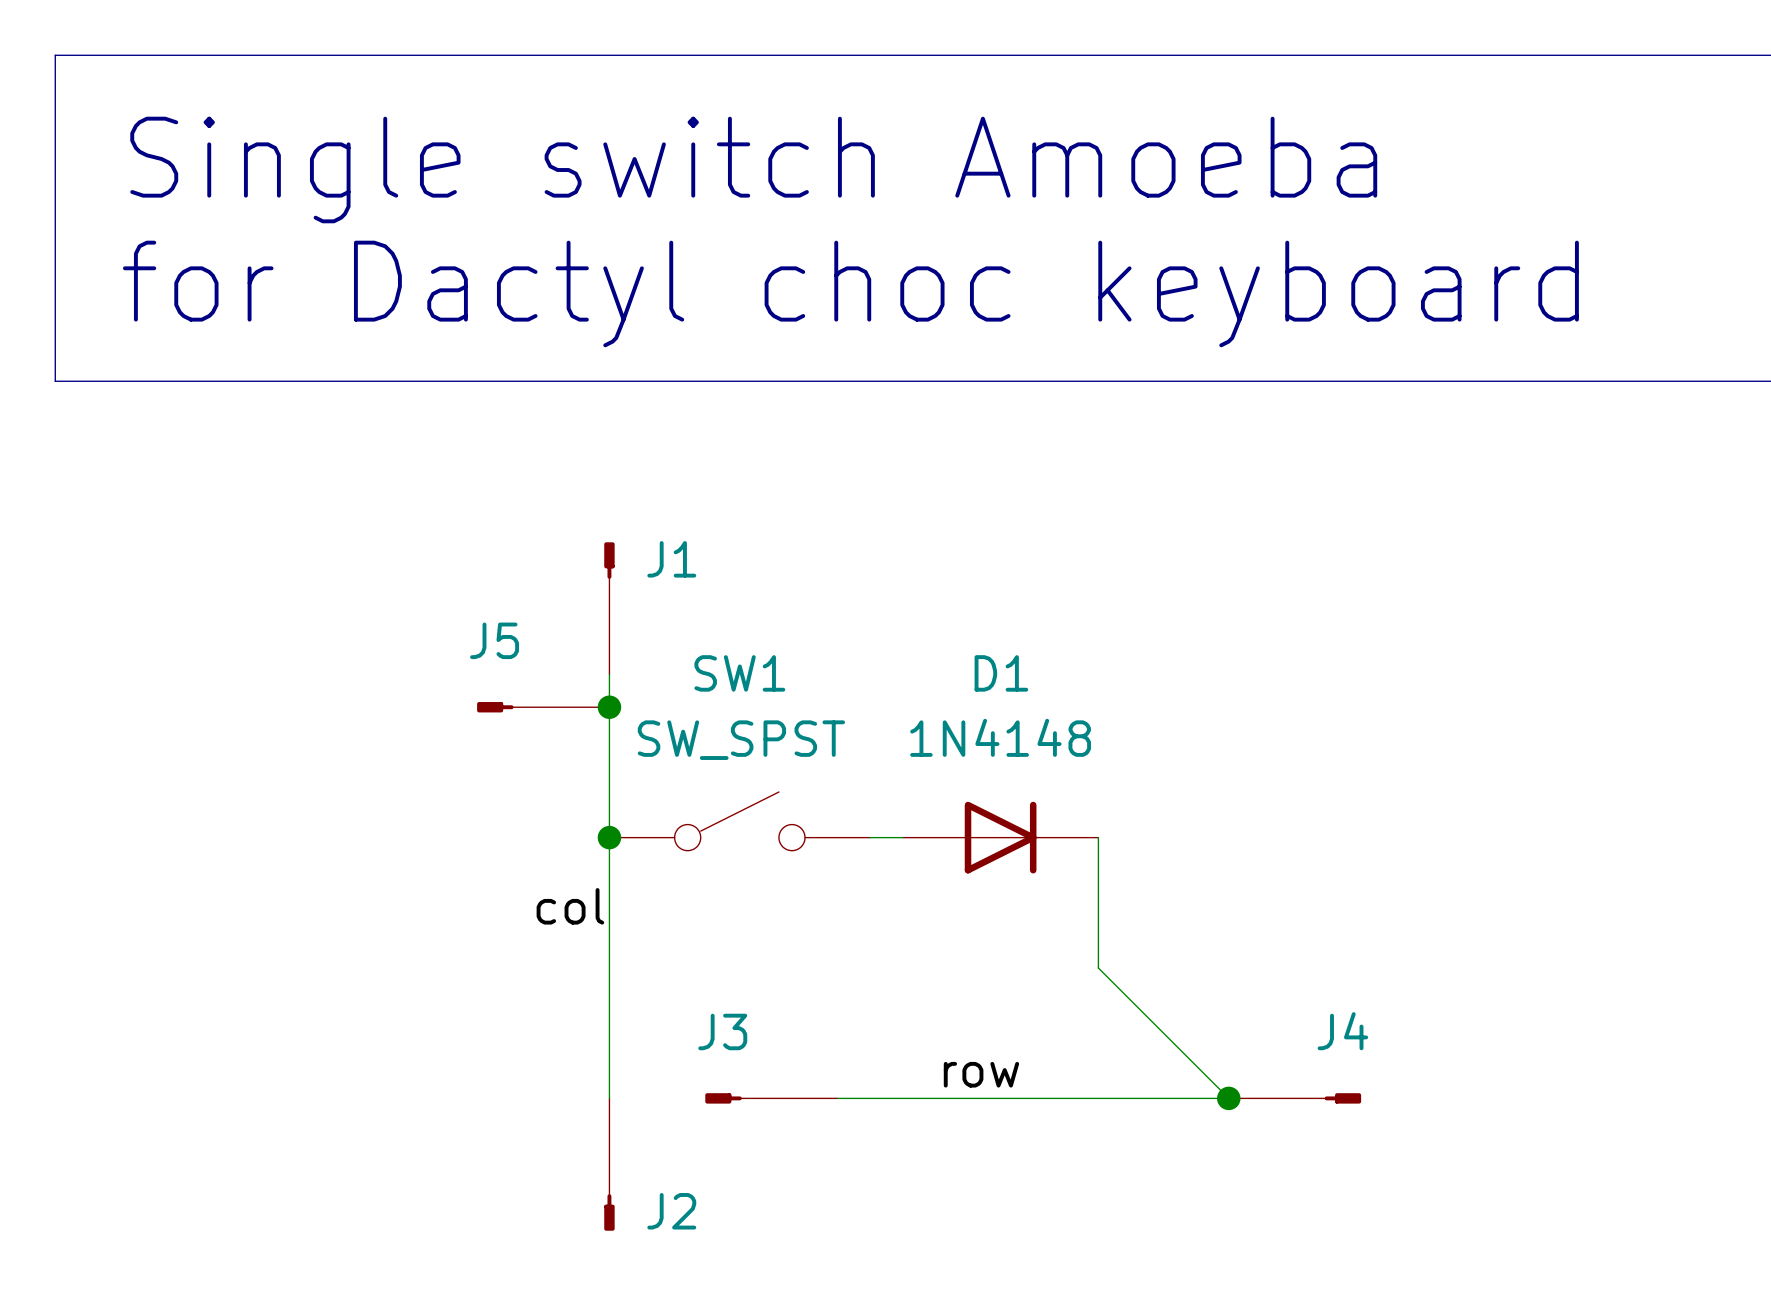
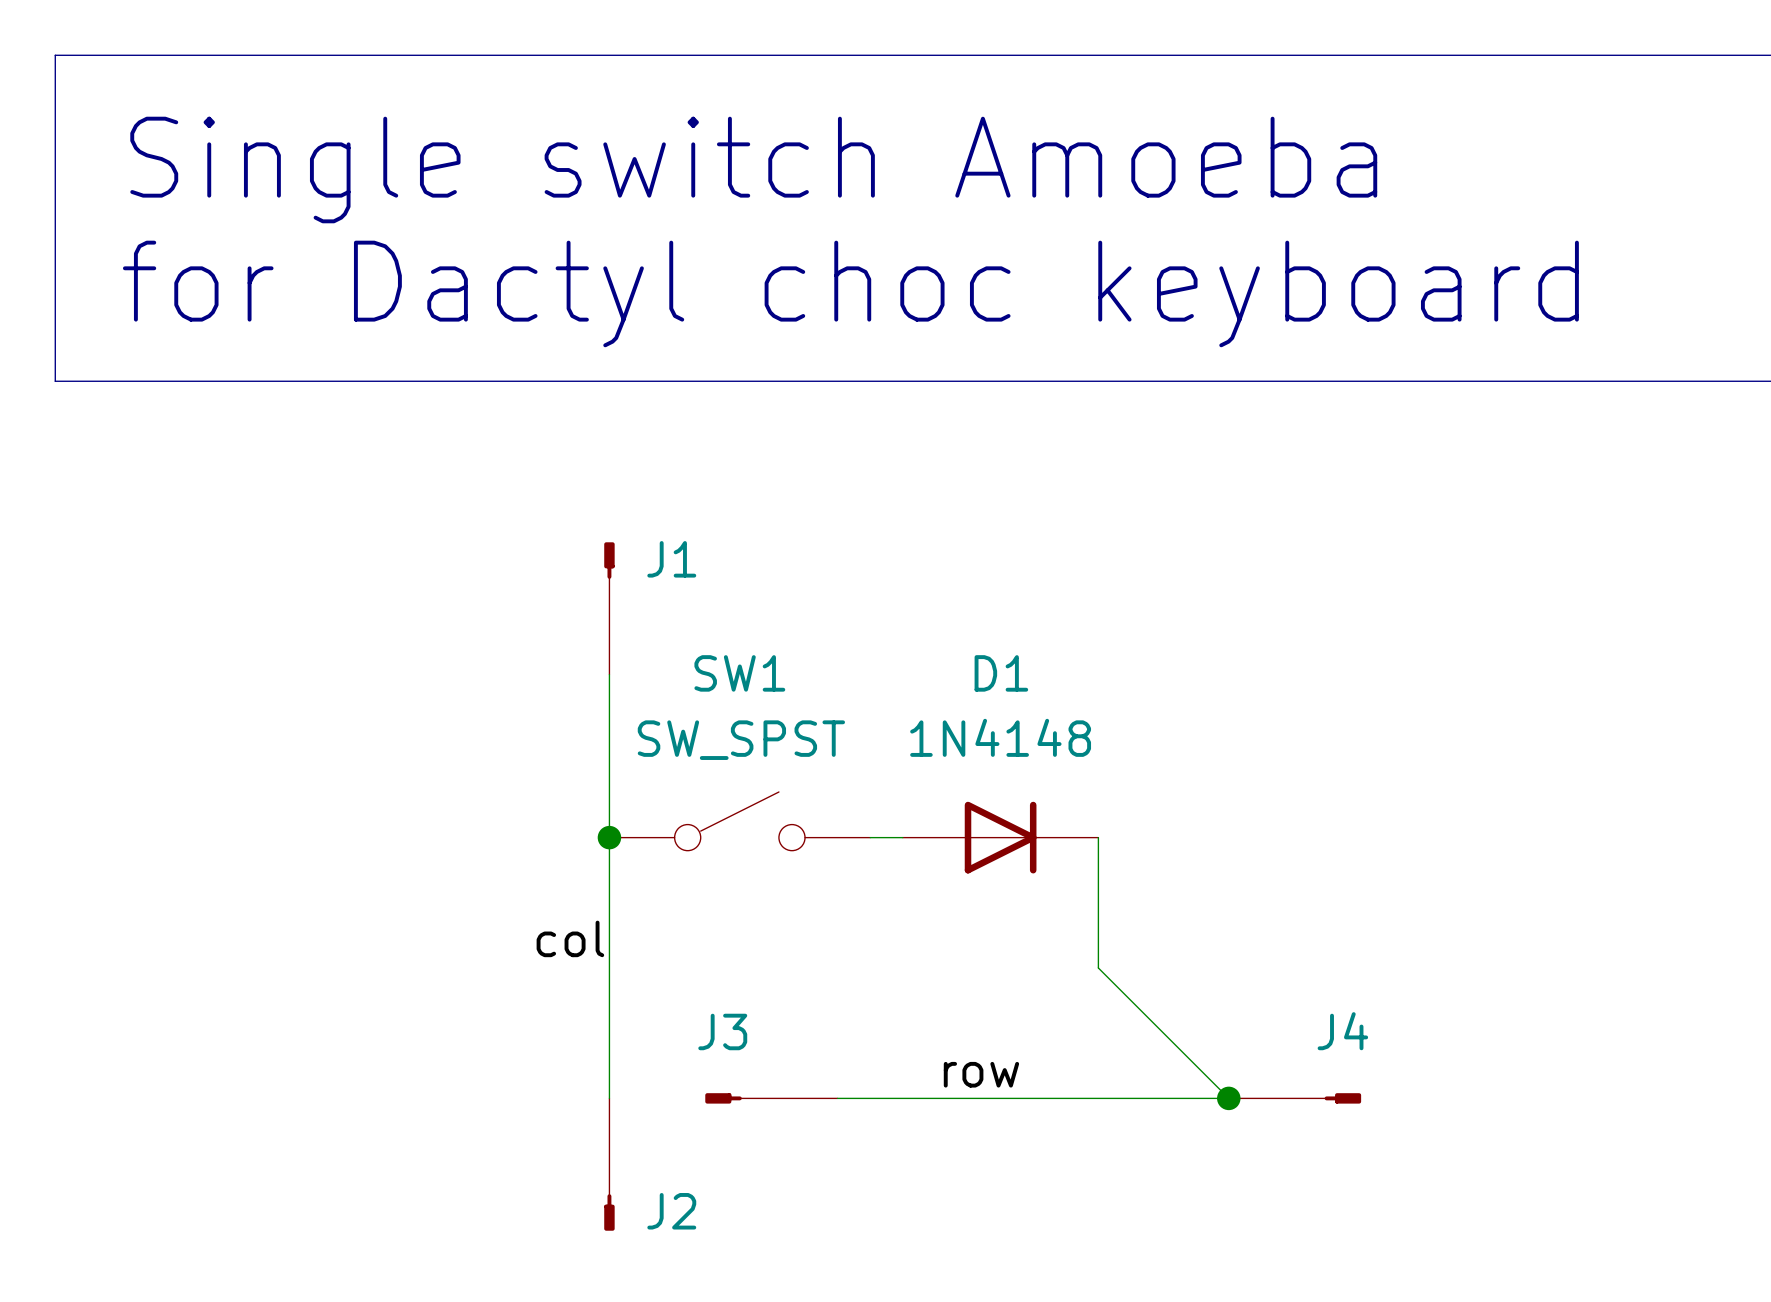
J5: (543, 707) -> none
junction: (609, 707) -> none
label position: col (570, 906) -> col (570, 938)

